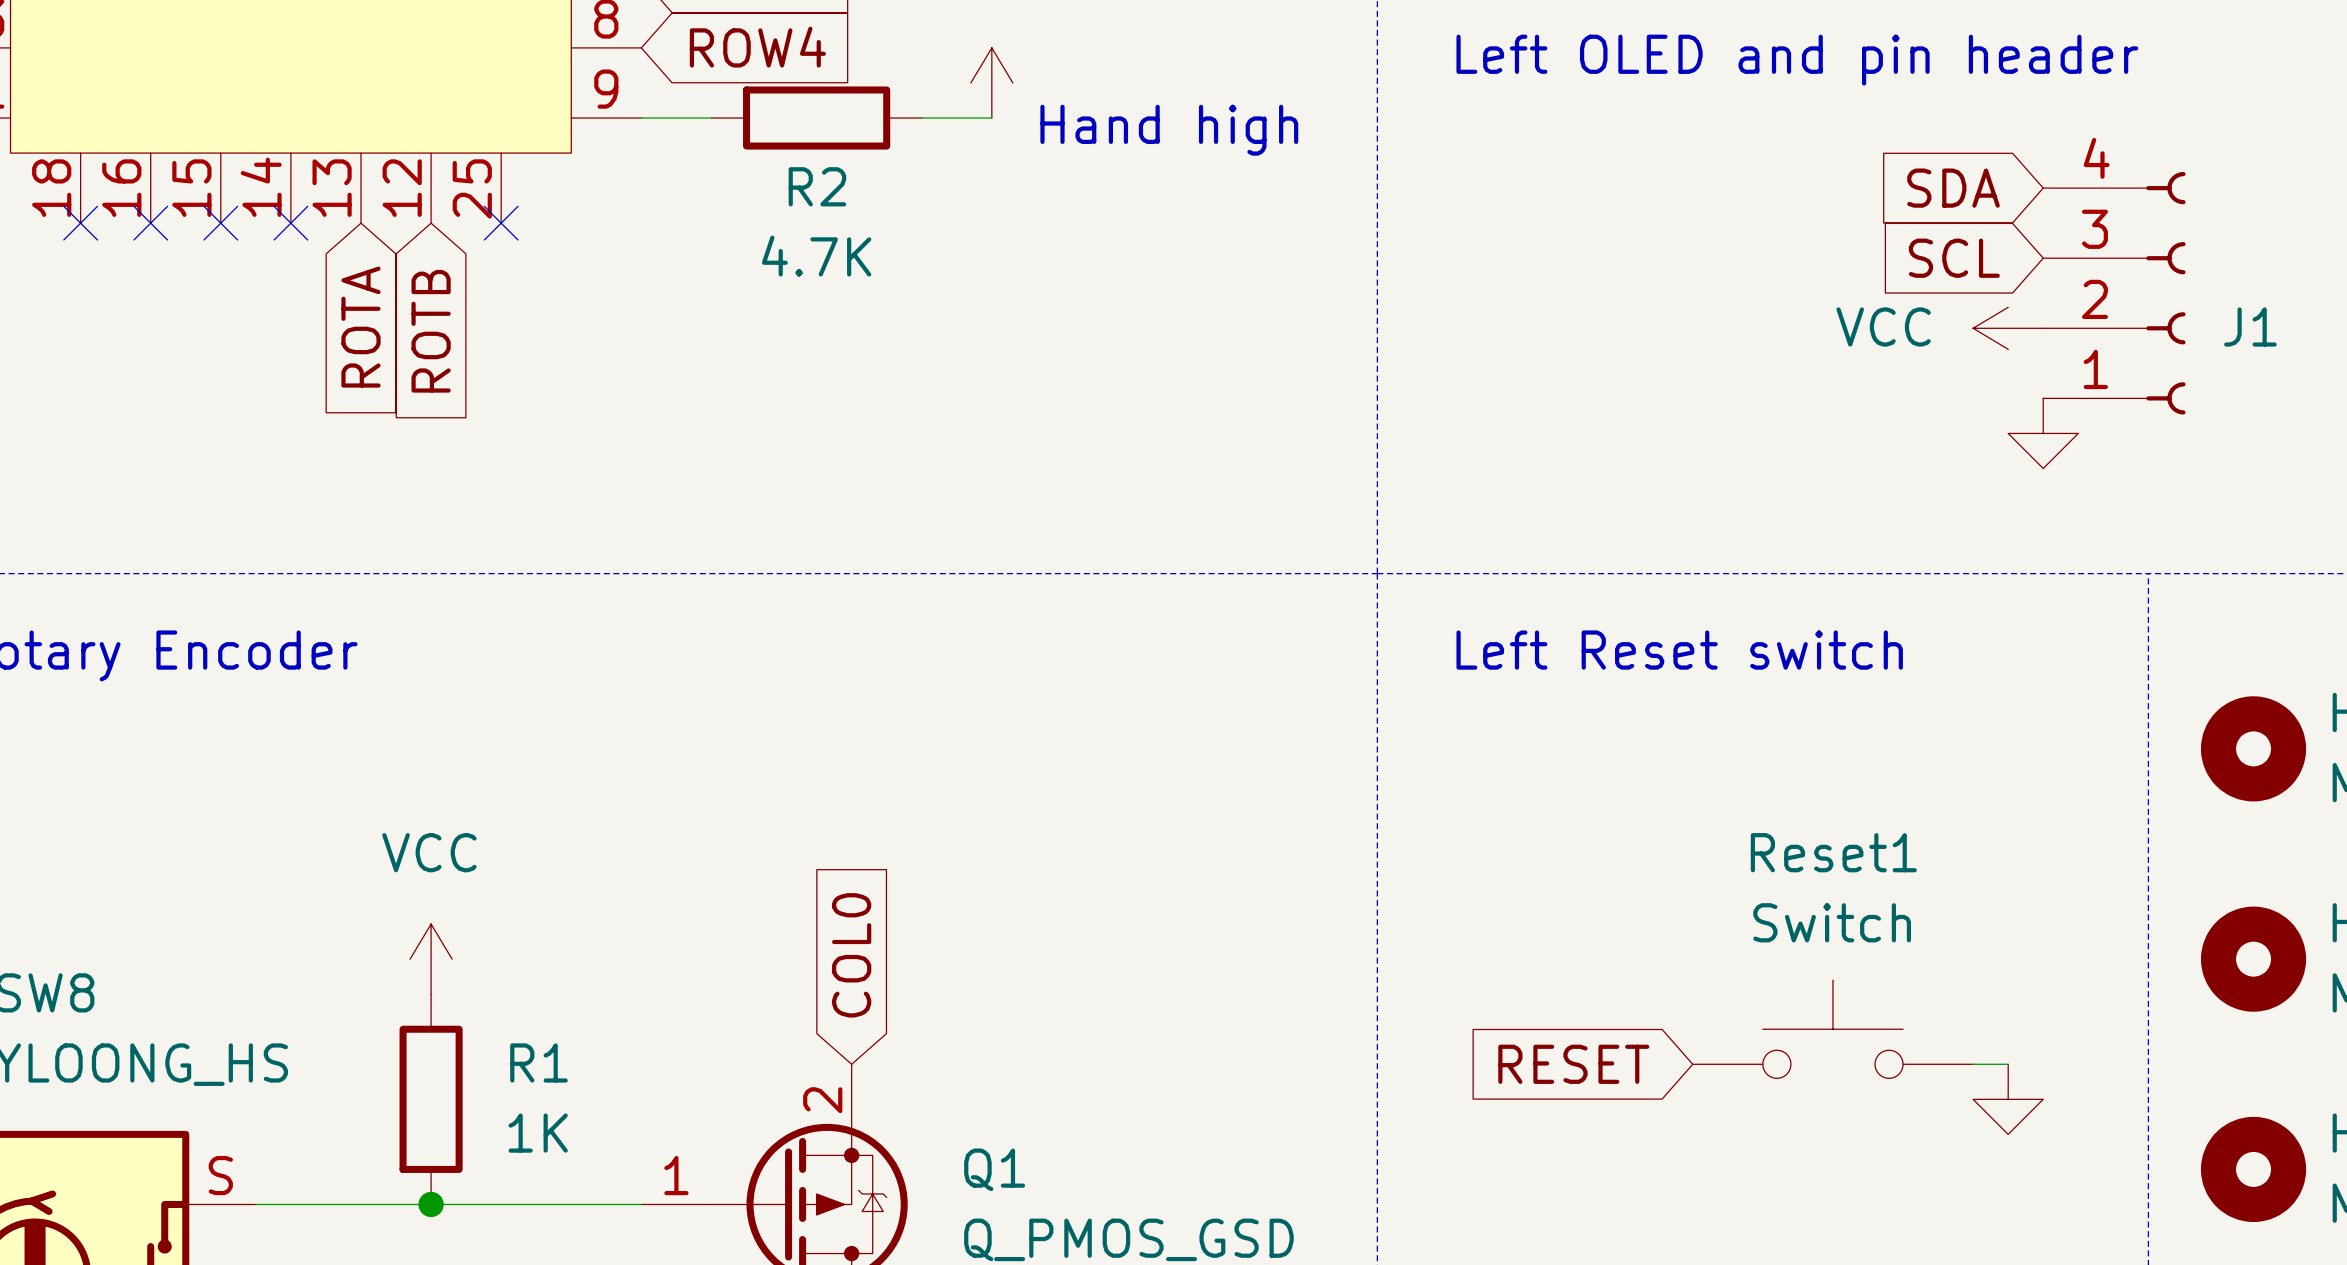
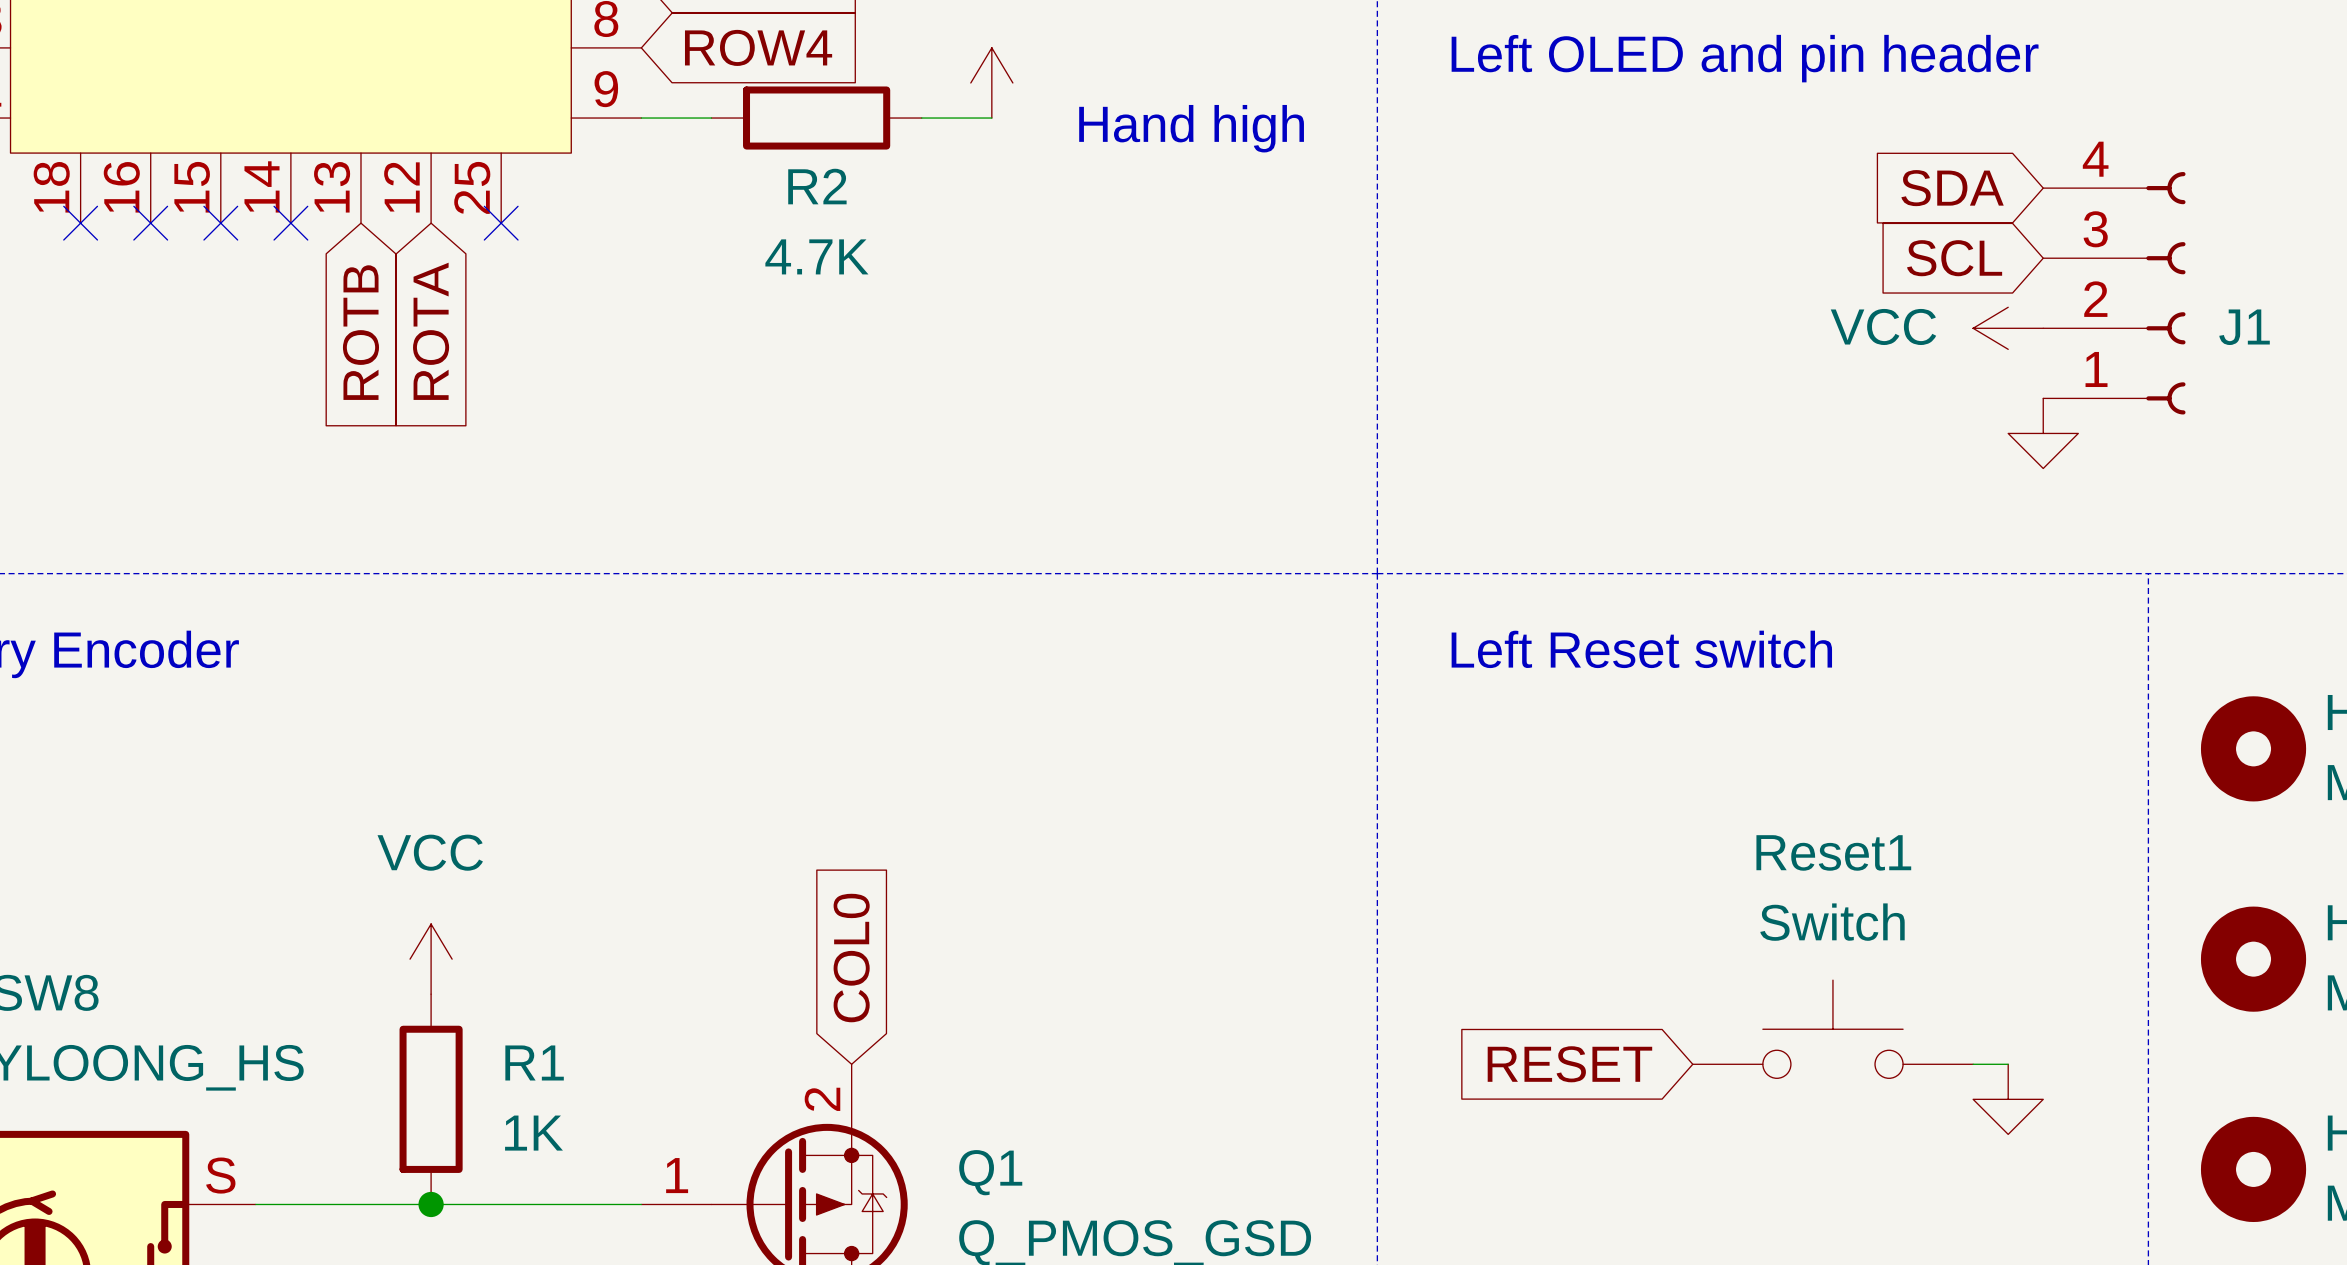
global label: ROTA (360, 327) -> ROTB (360, 332)
global label: ROTB (431, 331) -> ROTA (431, 331)

